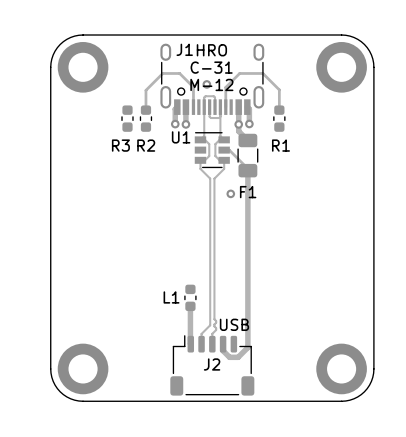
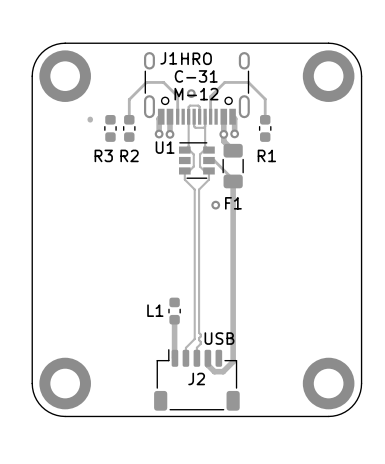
track: none -> (90, 119) (90, 119)

